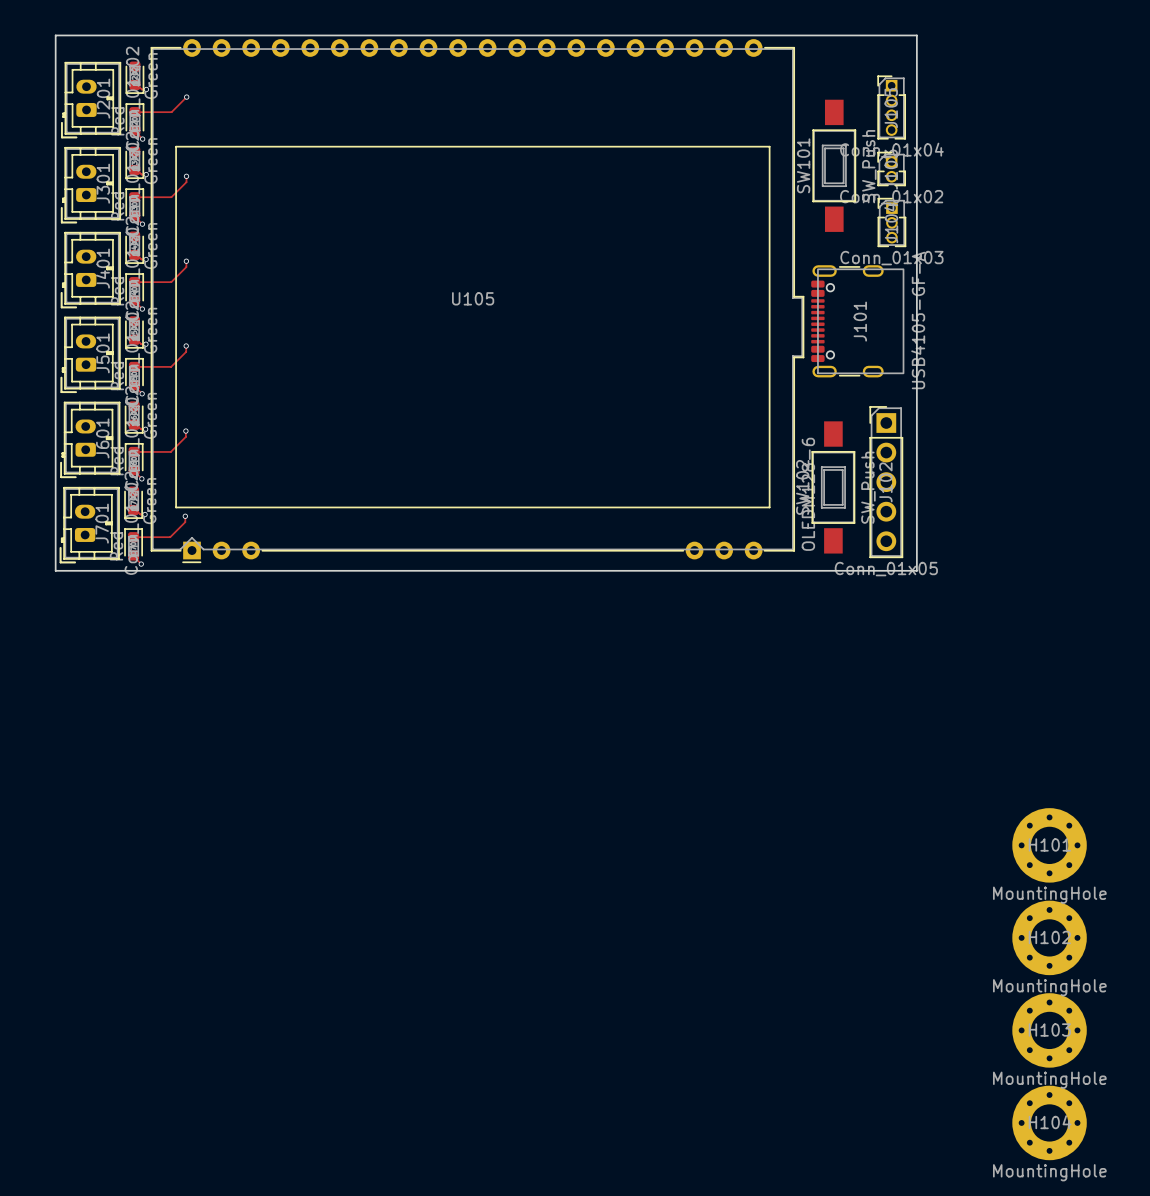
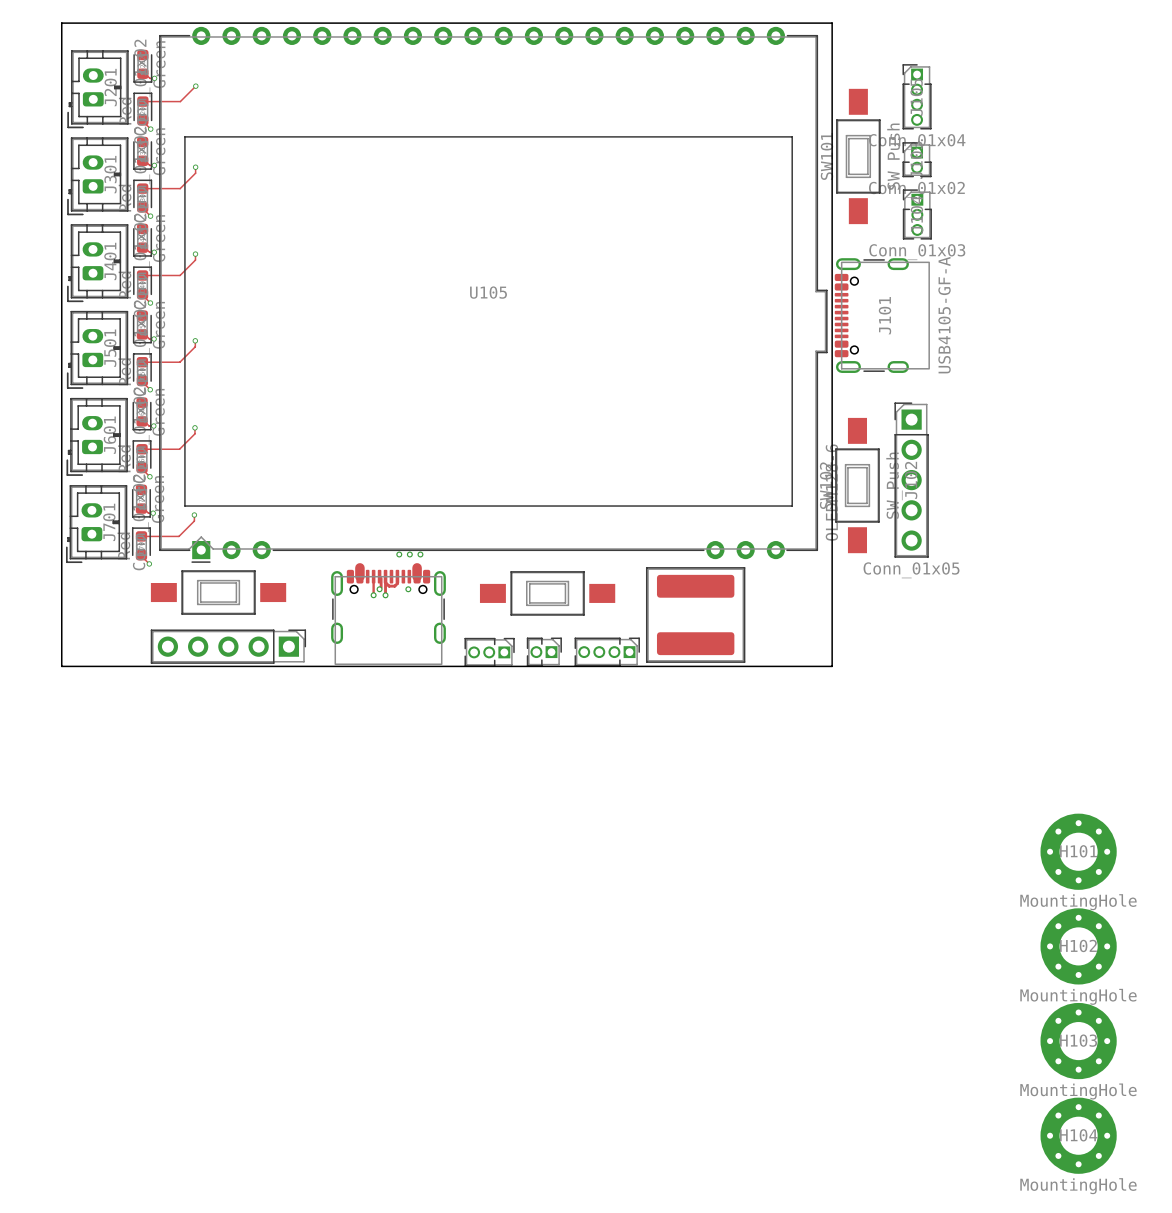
board edge: (808, 35) (916, 35) (916, 570) (55, 570) -> (832, 23) (832, 666) (61, 666) (61, 570)
via: none -> (399, 554)
via: none -> (409, 554)
via: none -> (420, 554)
track: none -> (359, 567) (359, 576)
track: none -> (417, 567) (417, 576)
track: none -> (373, 576) (373, 595)
track: none -> (385, 576) (385, 596)
track: none -> (397, 576) (397, 583) (394, 586) (389, 586) (385, 582)
track: none -> (381, 578) (381, 587)
via: none -> (379, 589)
via: none -> (408, 589)
part: none -> (218, 592)
part: none -> (547, 593)
via: none -> (373, 595)
via: none -> (385, 595)
part: none -> (695, 614)
part: none -> (388, 617)
part: none -> (228, 646)
part: none -> (489, 652)
part: none -> (544, 652)
part: none -> (607, 652)

